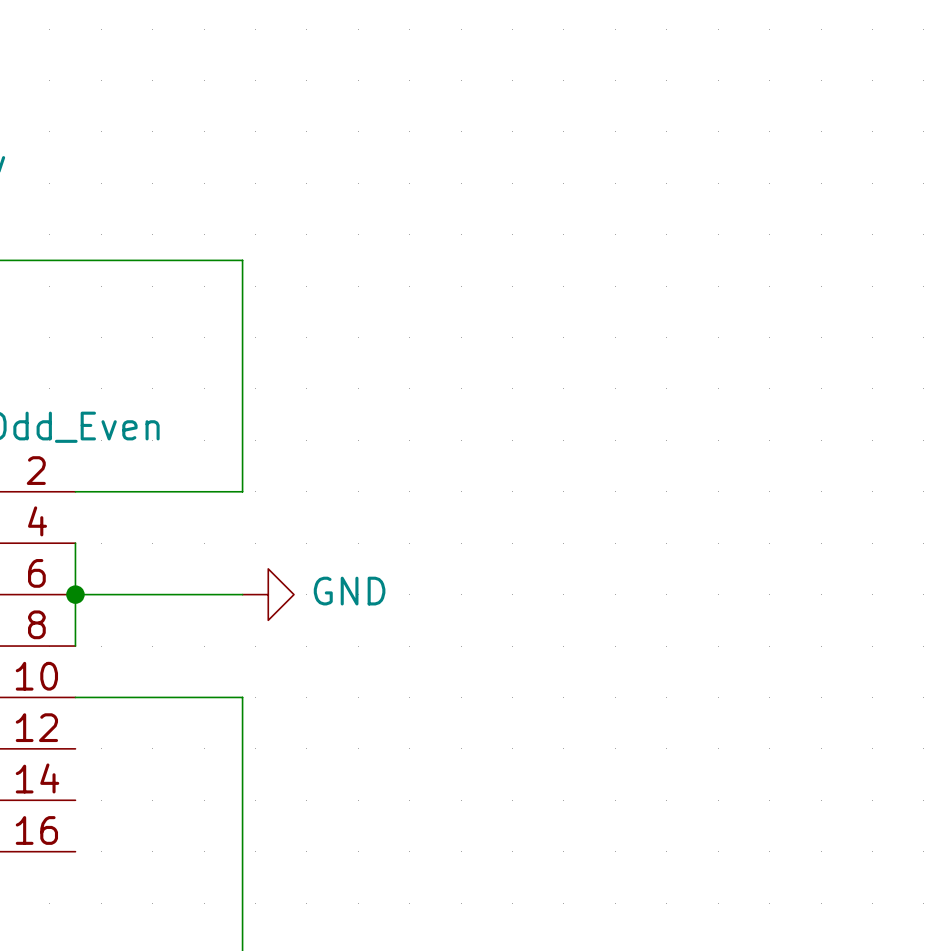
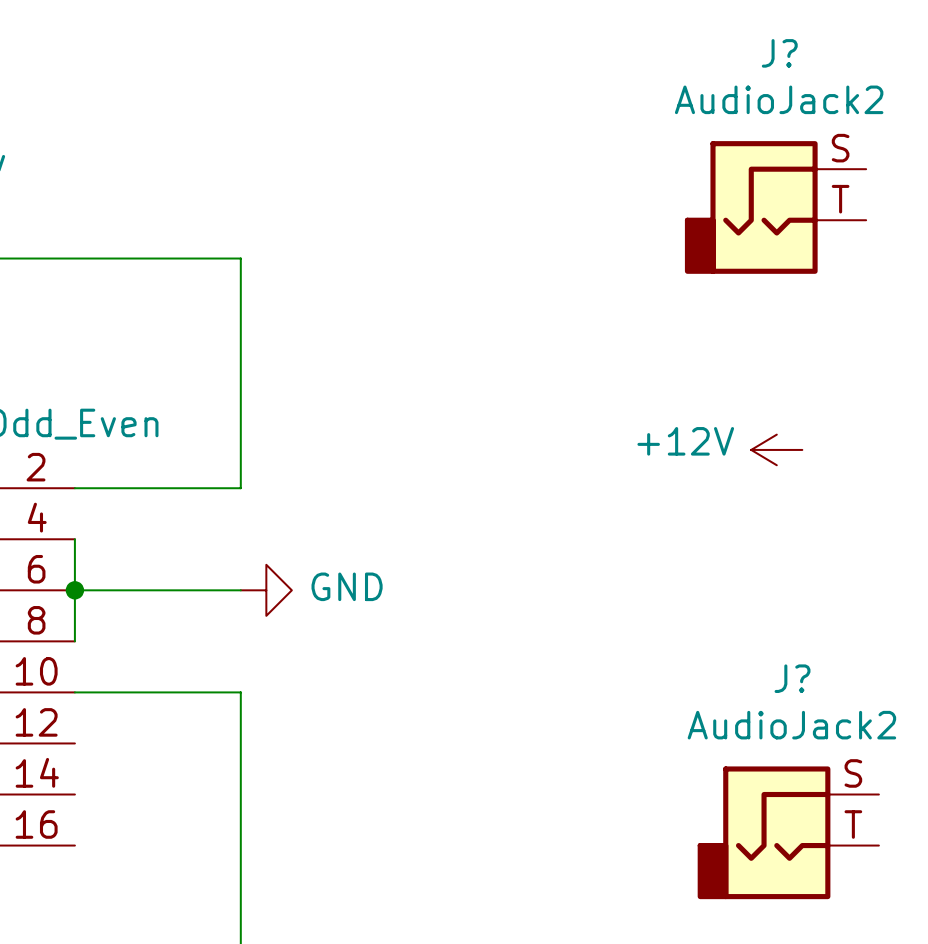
J?: none -> AudioJack2 (775, 207)
power symbol: none -> +12V (776, 449)
J?: none -> AudioJack2 (788, 832)

